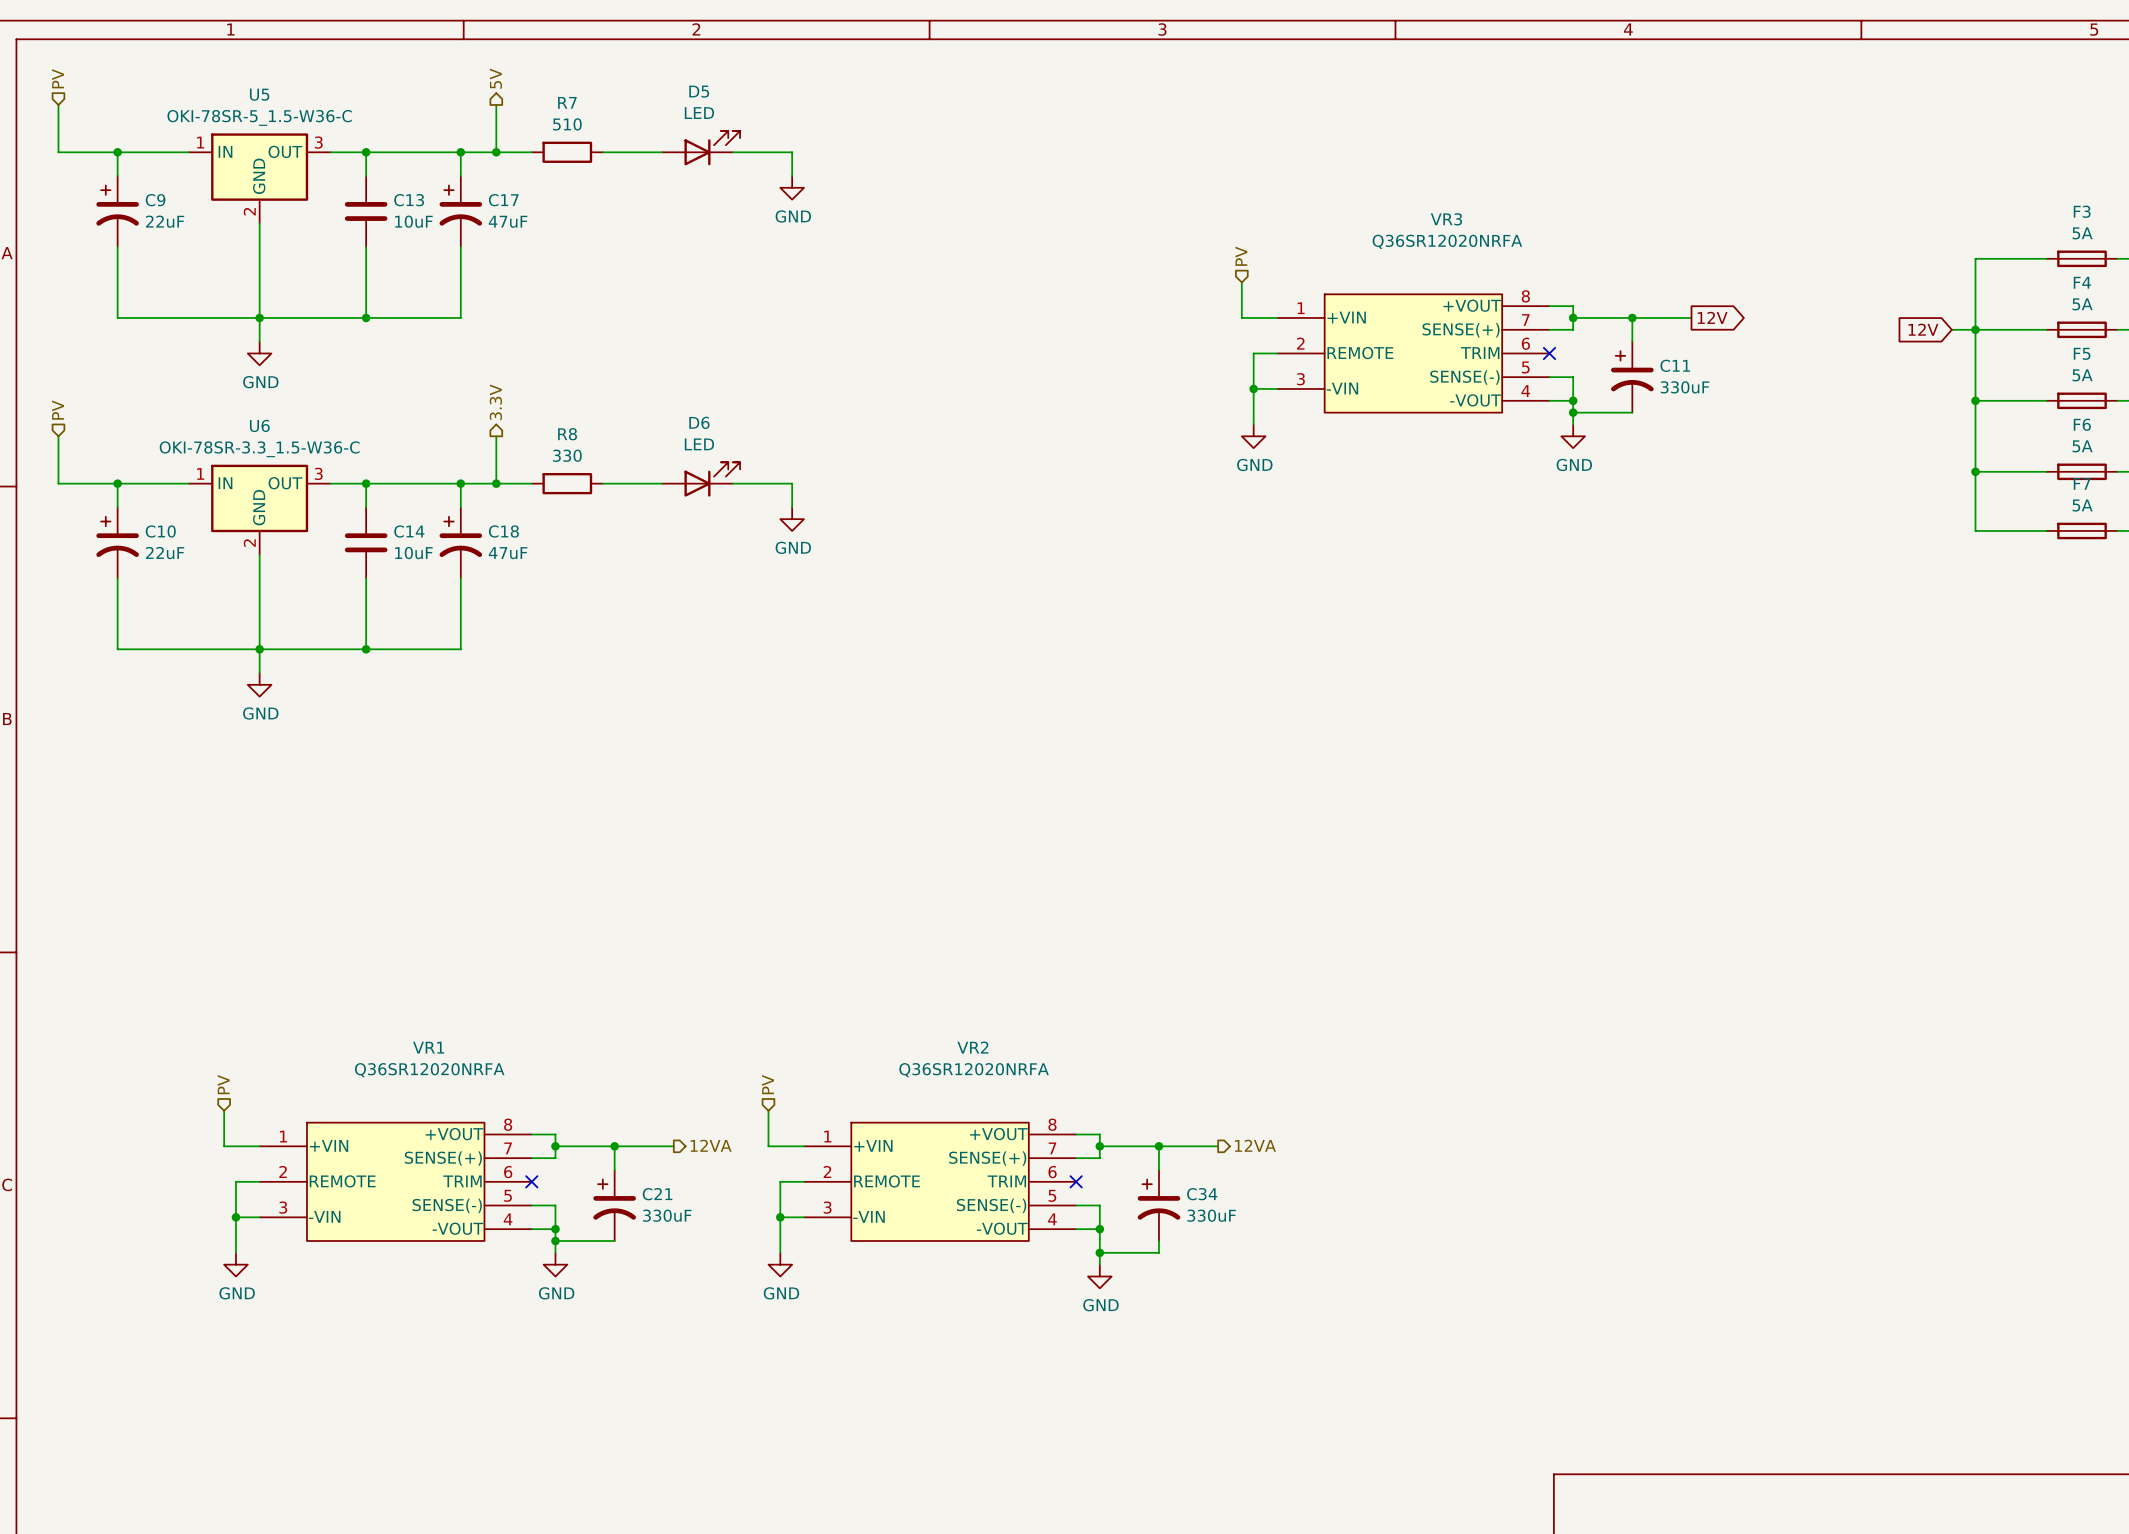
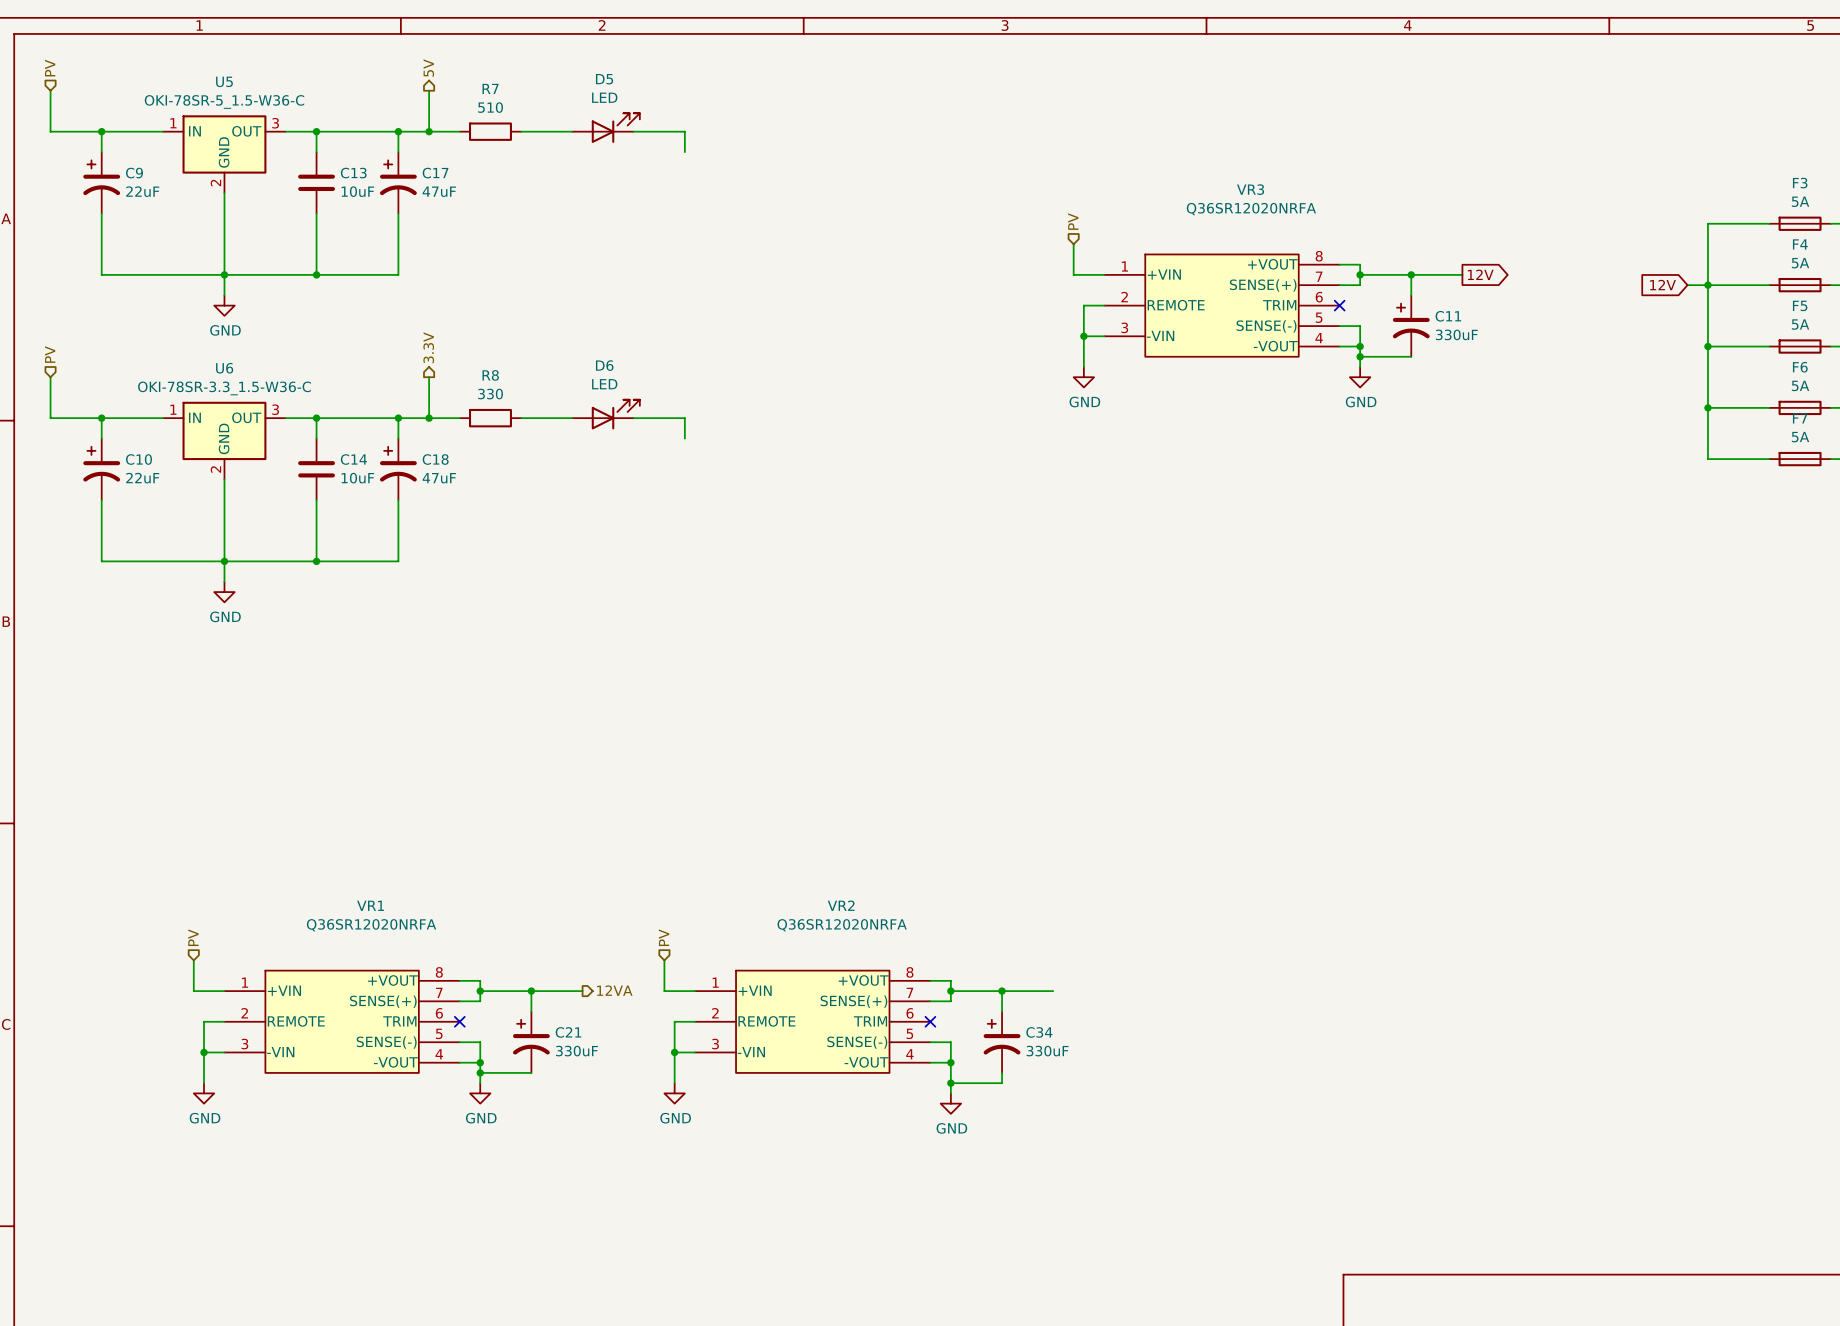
power symbol: GND (792, 187) -> none
power symbol: GND (792, 519) -> none
hierarchical label: 12VA (1255, 1145) -> none

